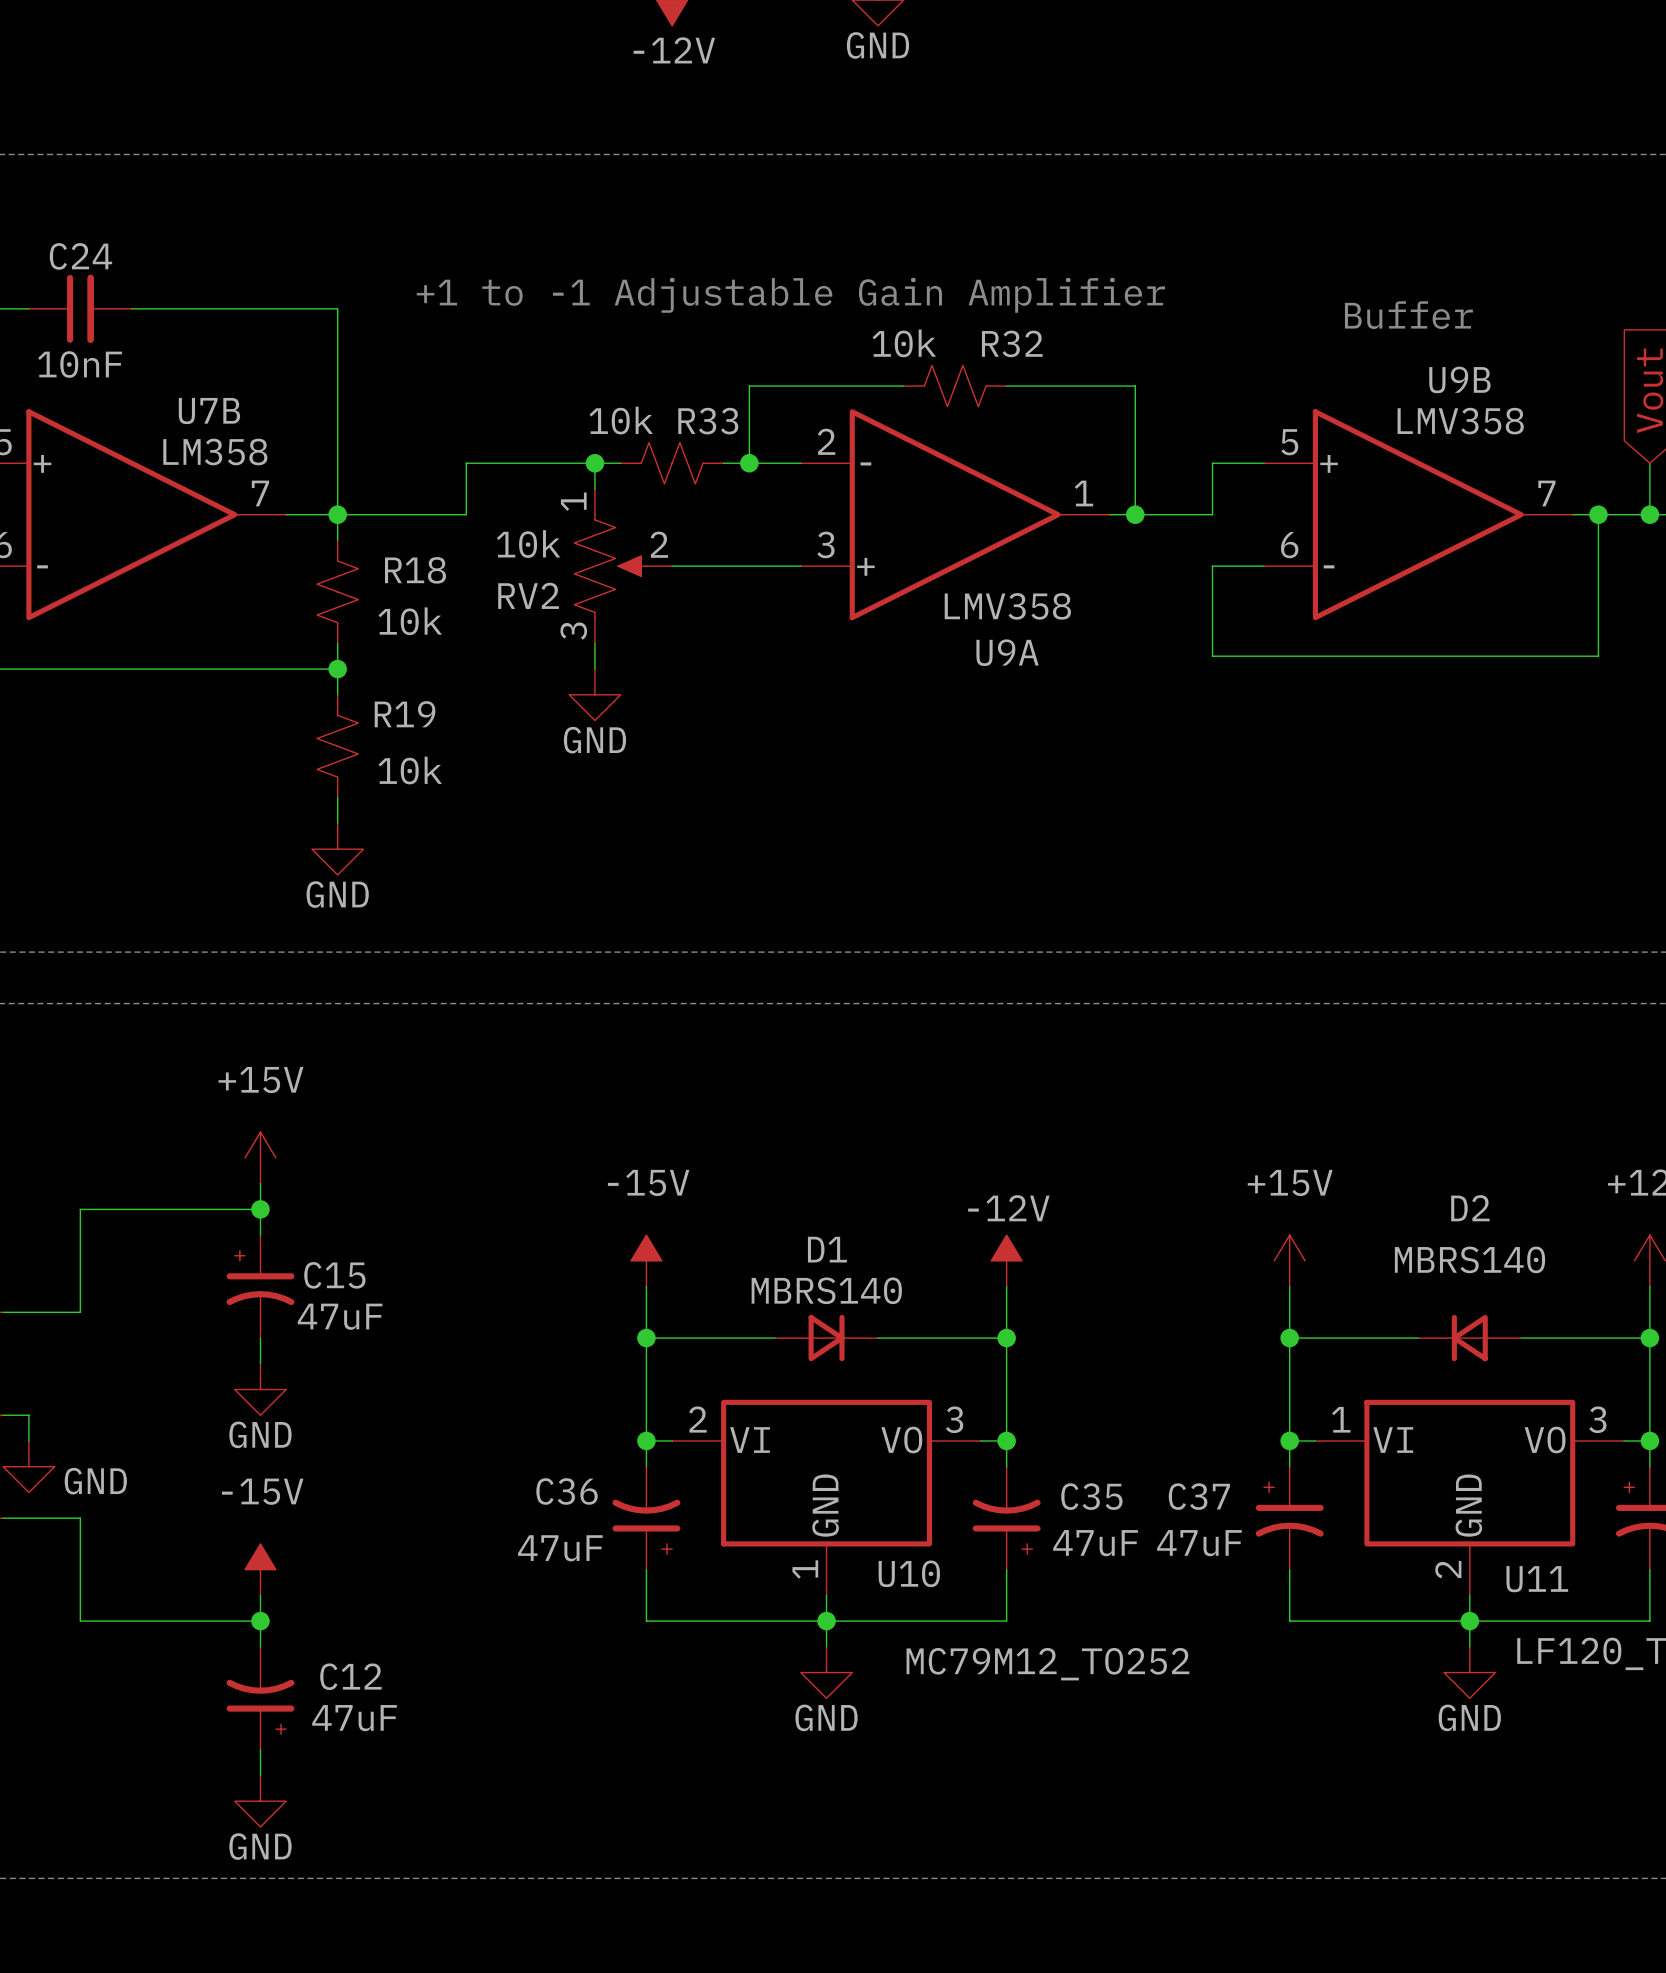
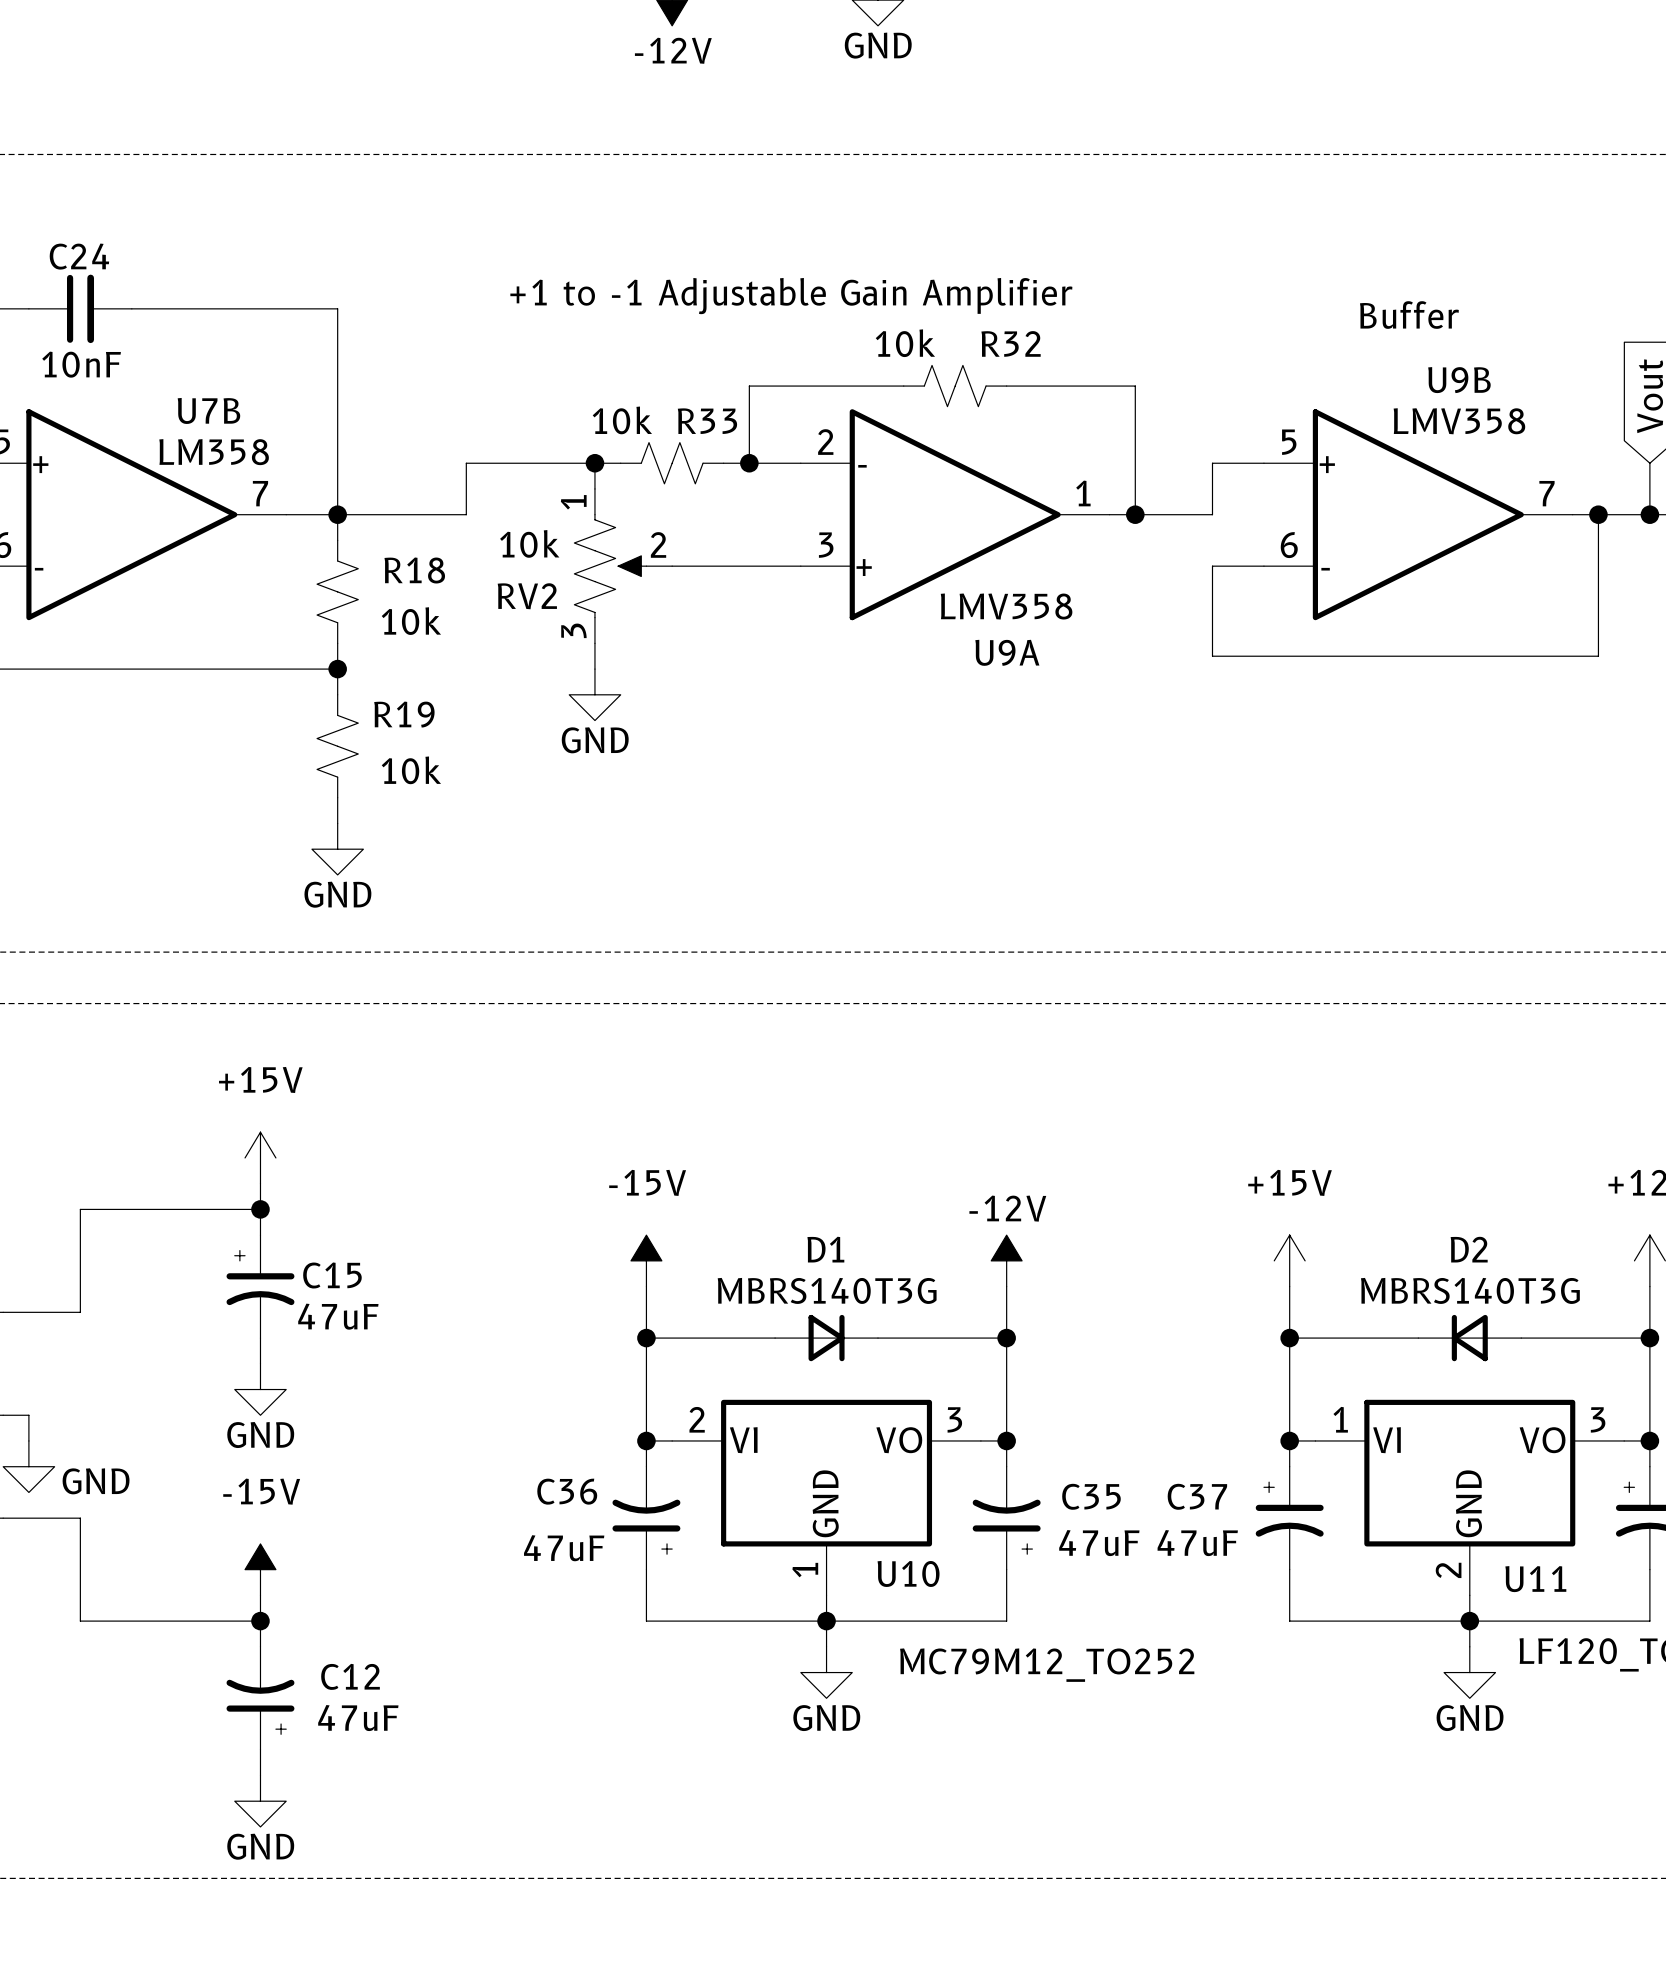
D2 name position: D2 (1470, 1208) -> D2 (1469, 1249)
D2 value: MBRS140 (1470, 1259) -> MBRS140T3G (1470, 1290)
D1 value: MBRS140 (826, 1290) -> MBRS140T3G (827, 1290)

